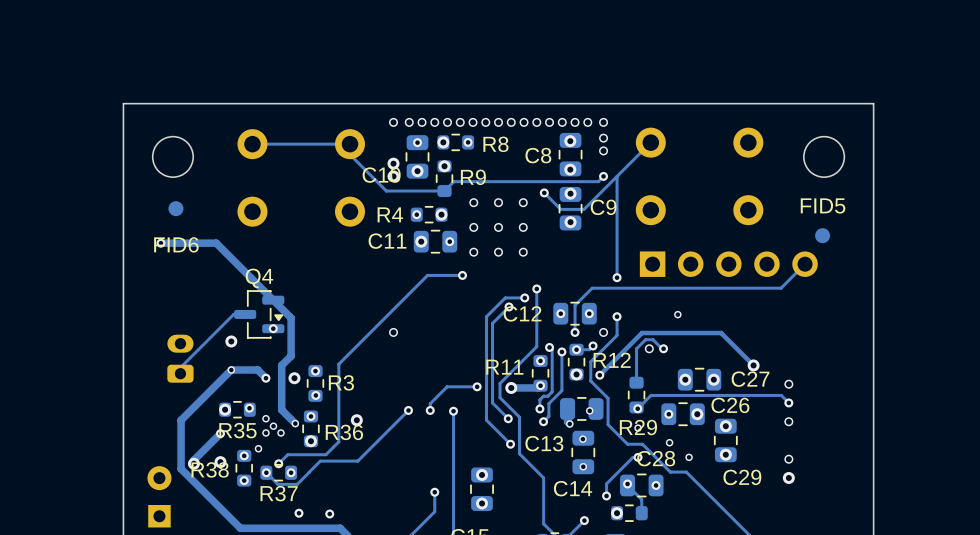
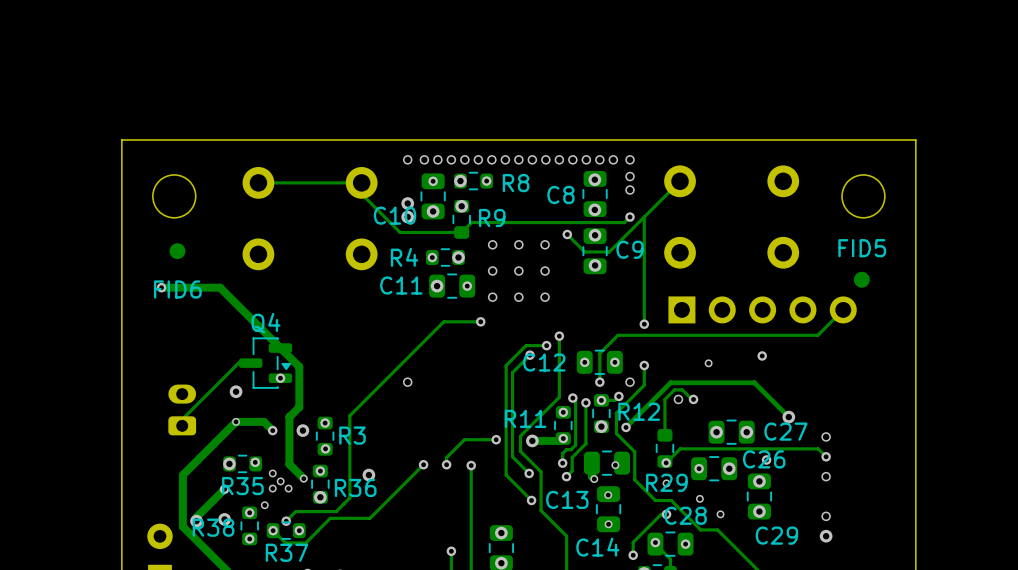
via: none -> (762, 355)
via: none -> (766, 459)

